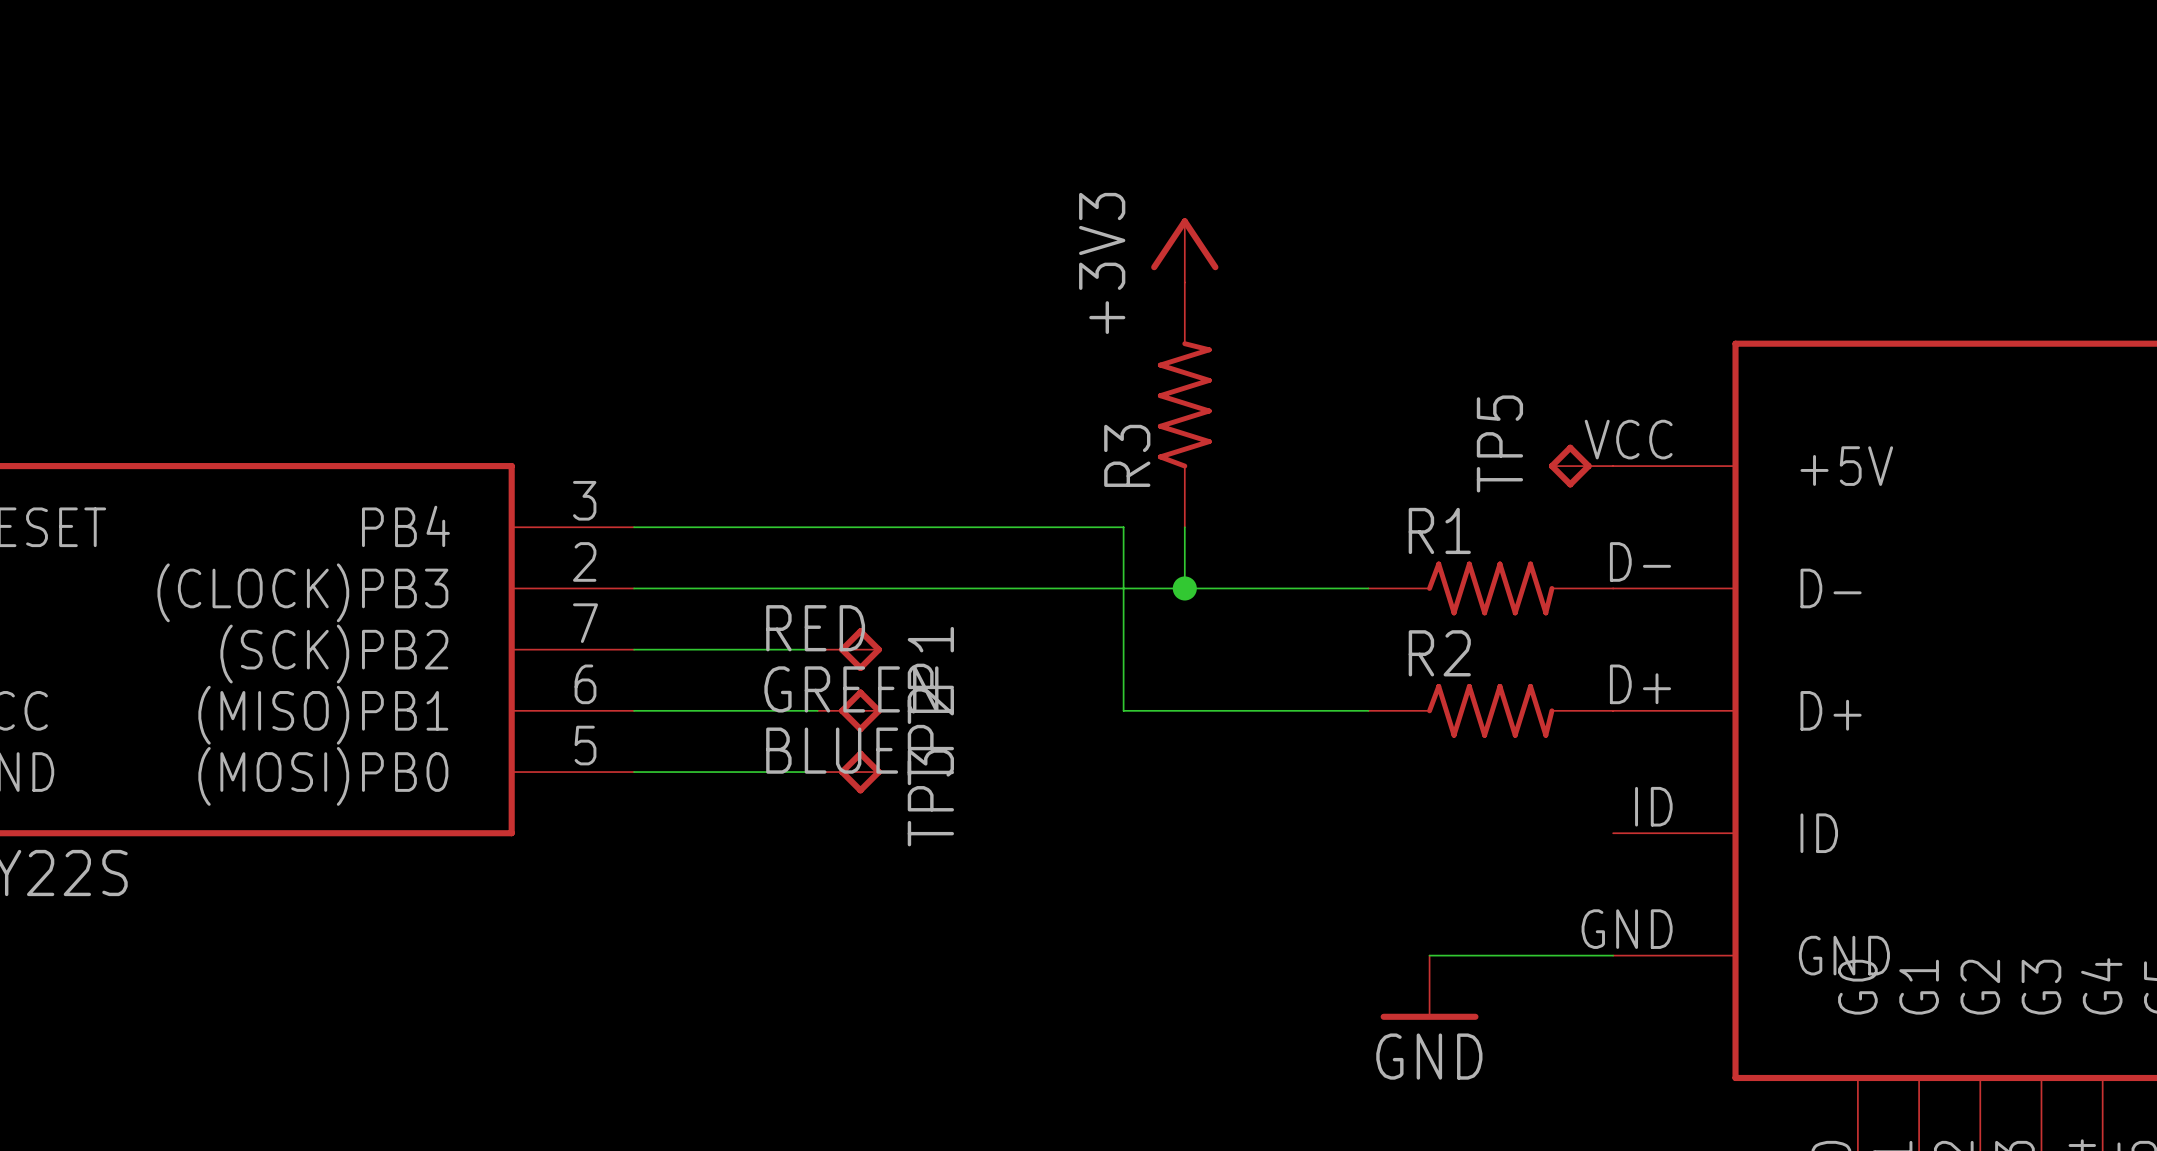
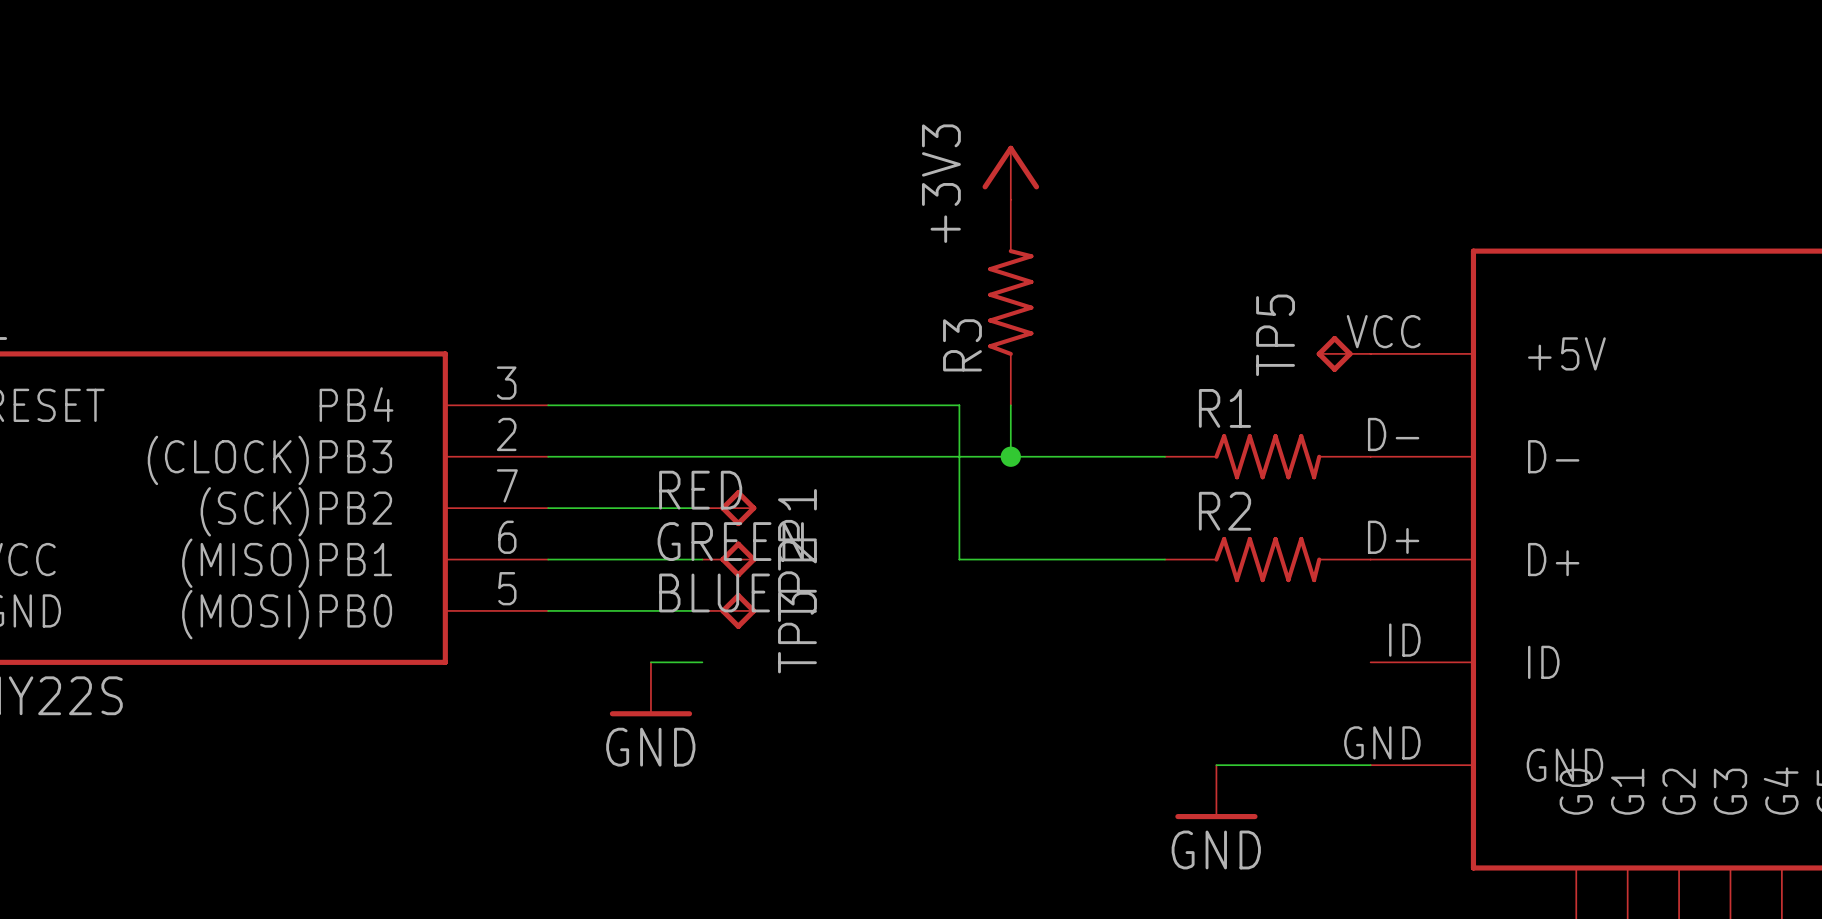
wire: none -> (650, 662) (702, 662)
power symbol: none -> GND (650, 689)

